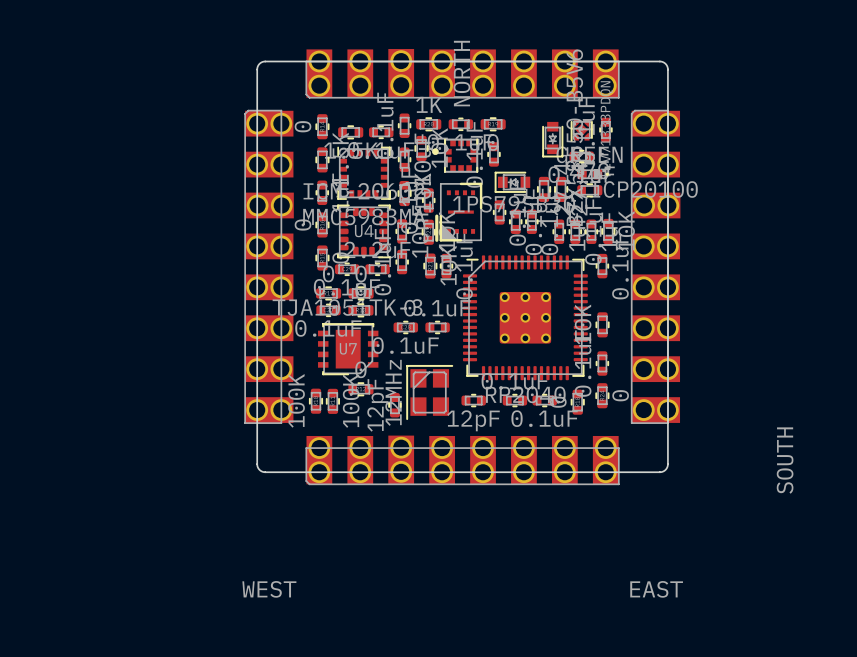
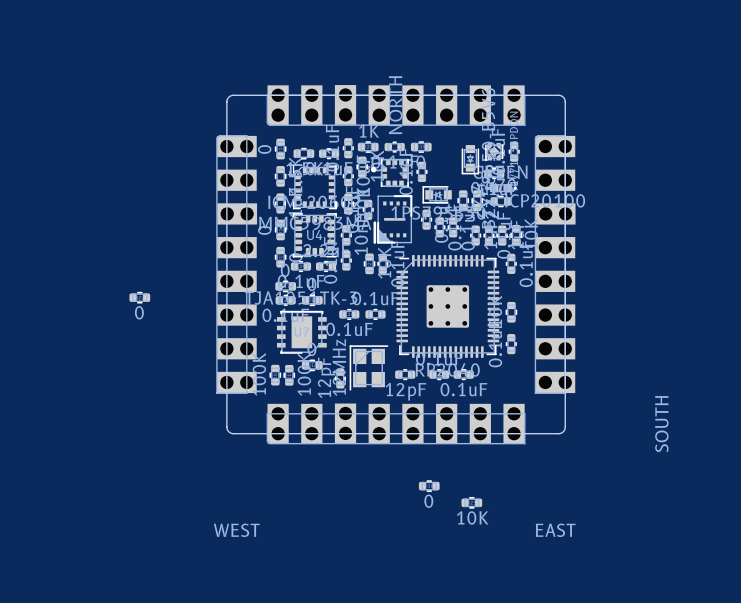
part rotation: 0° (428, 232) -> 90° clockwise (471, 502)
part position: (428, 232) -> (471, 502)
part value position: 0 (361, 273) -> 0 (139, 312)
part position: (361, 293) -> (139, 297)
part: 0 (602, 395) -> none
part rotation: 0° (577, 402) -> 90° clockwise (429, 486)
part position: (577, 402) -> (429, 486)

